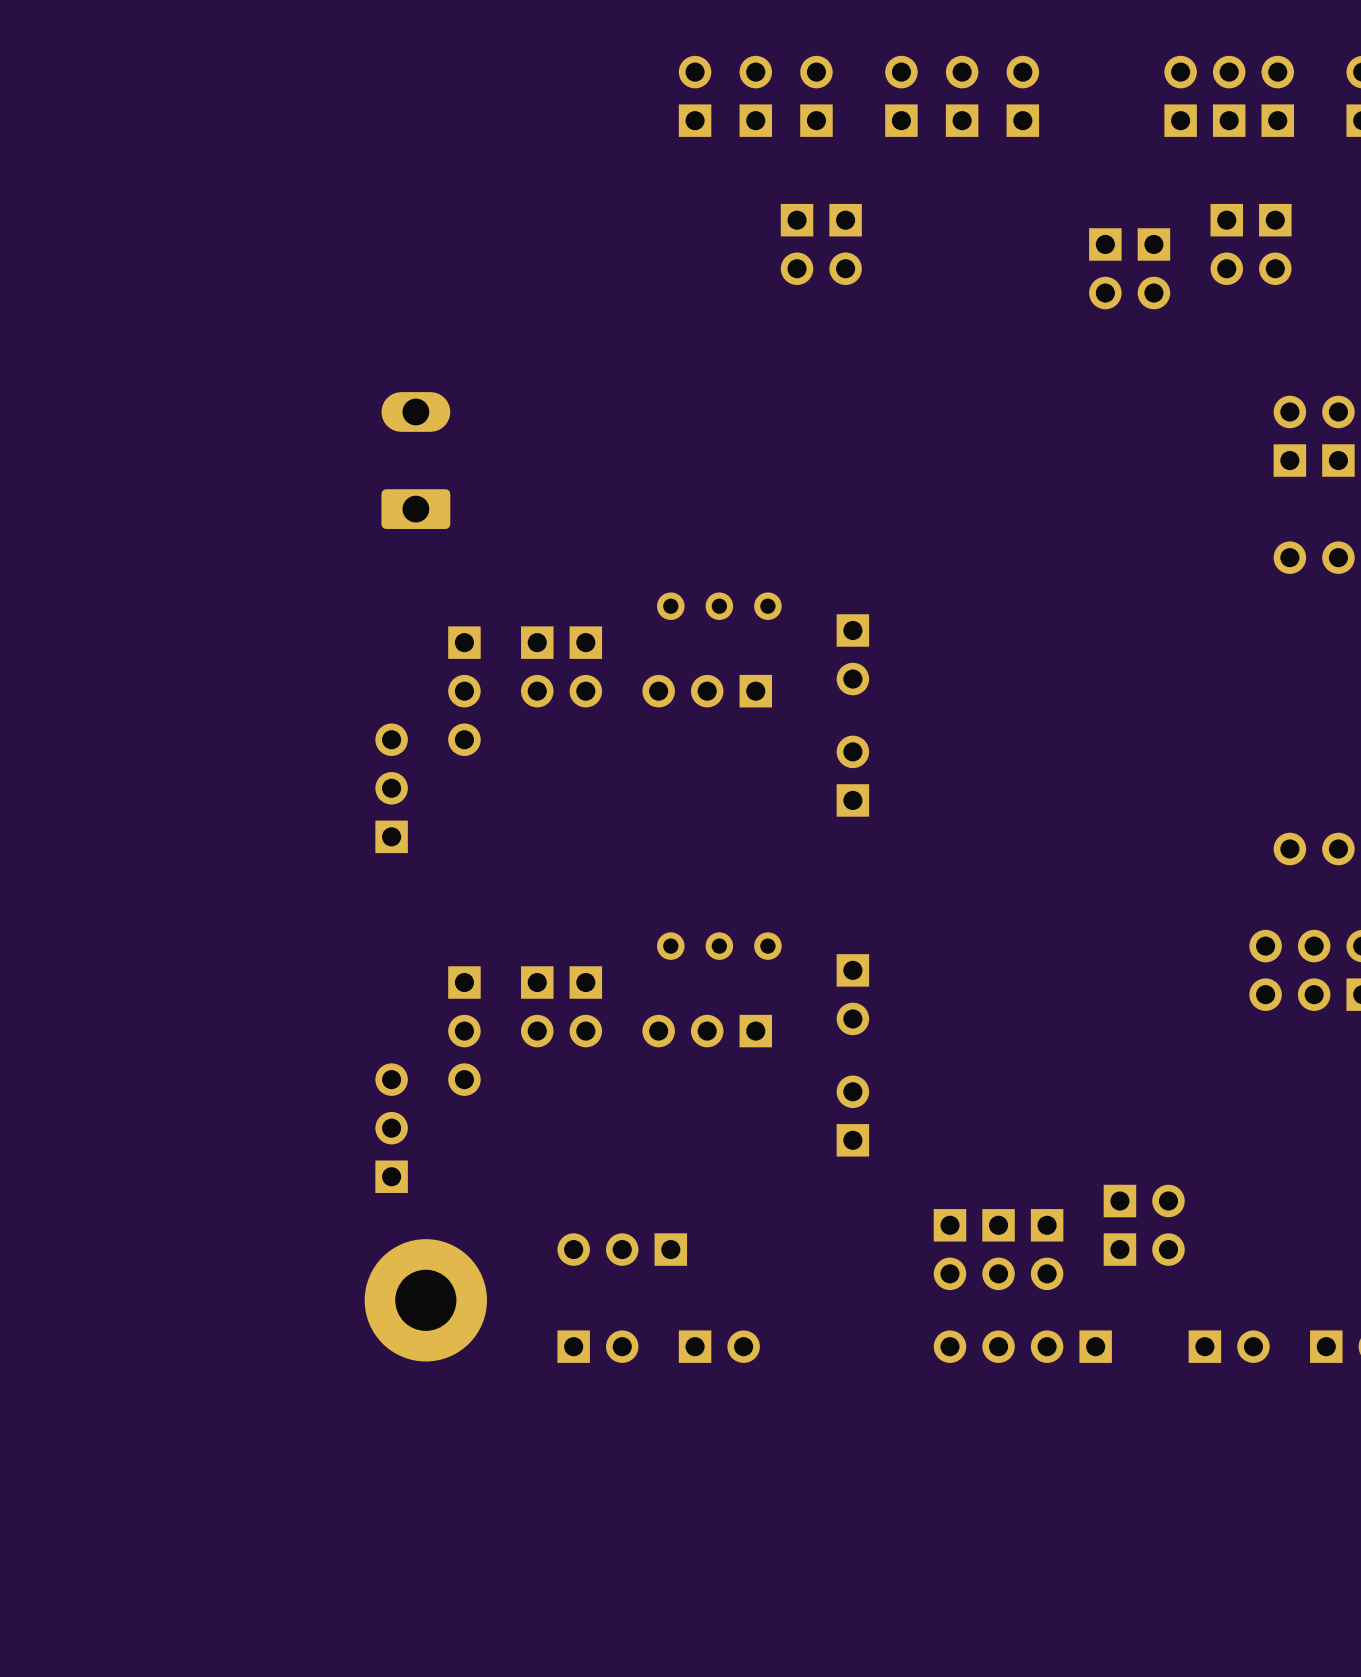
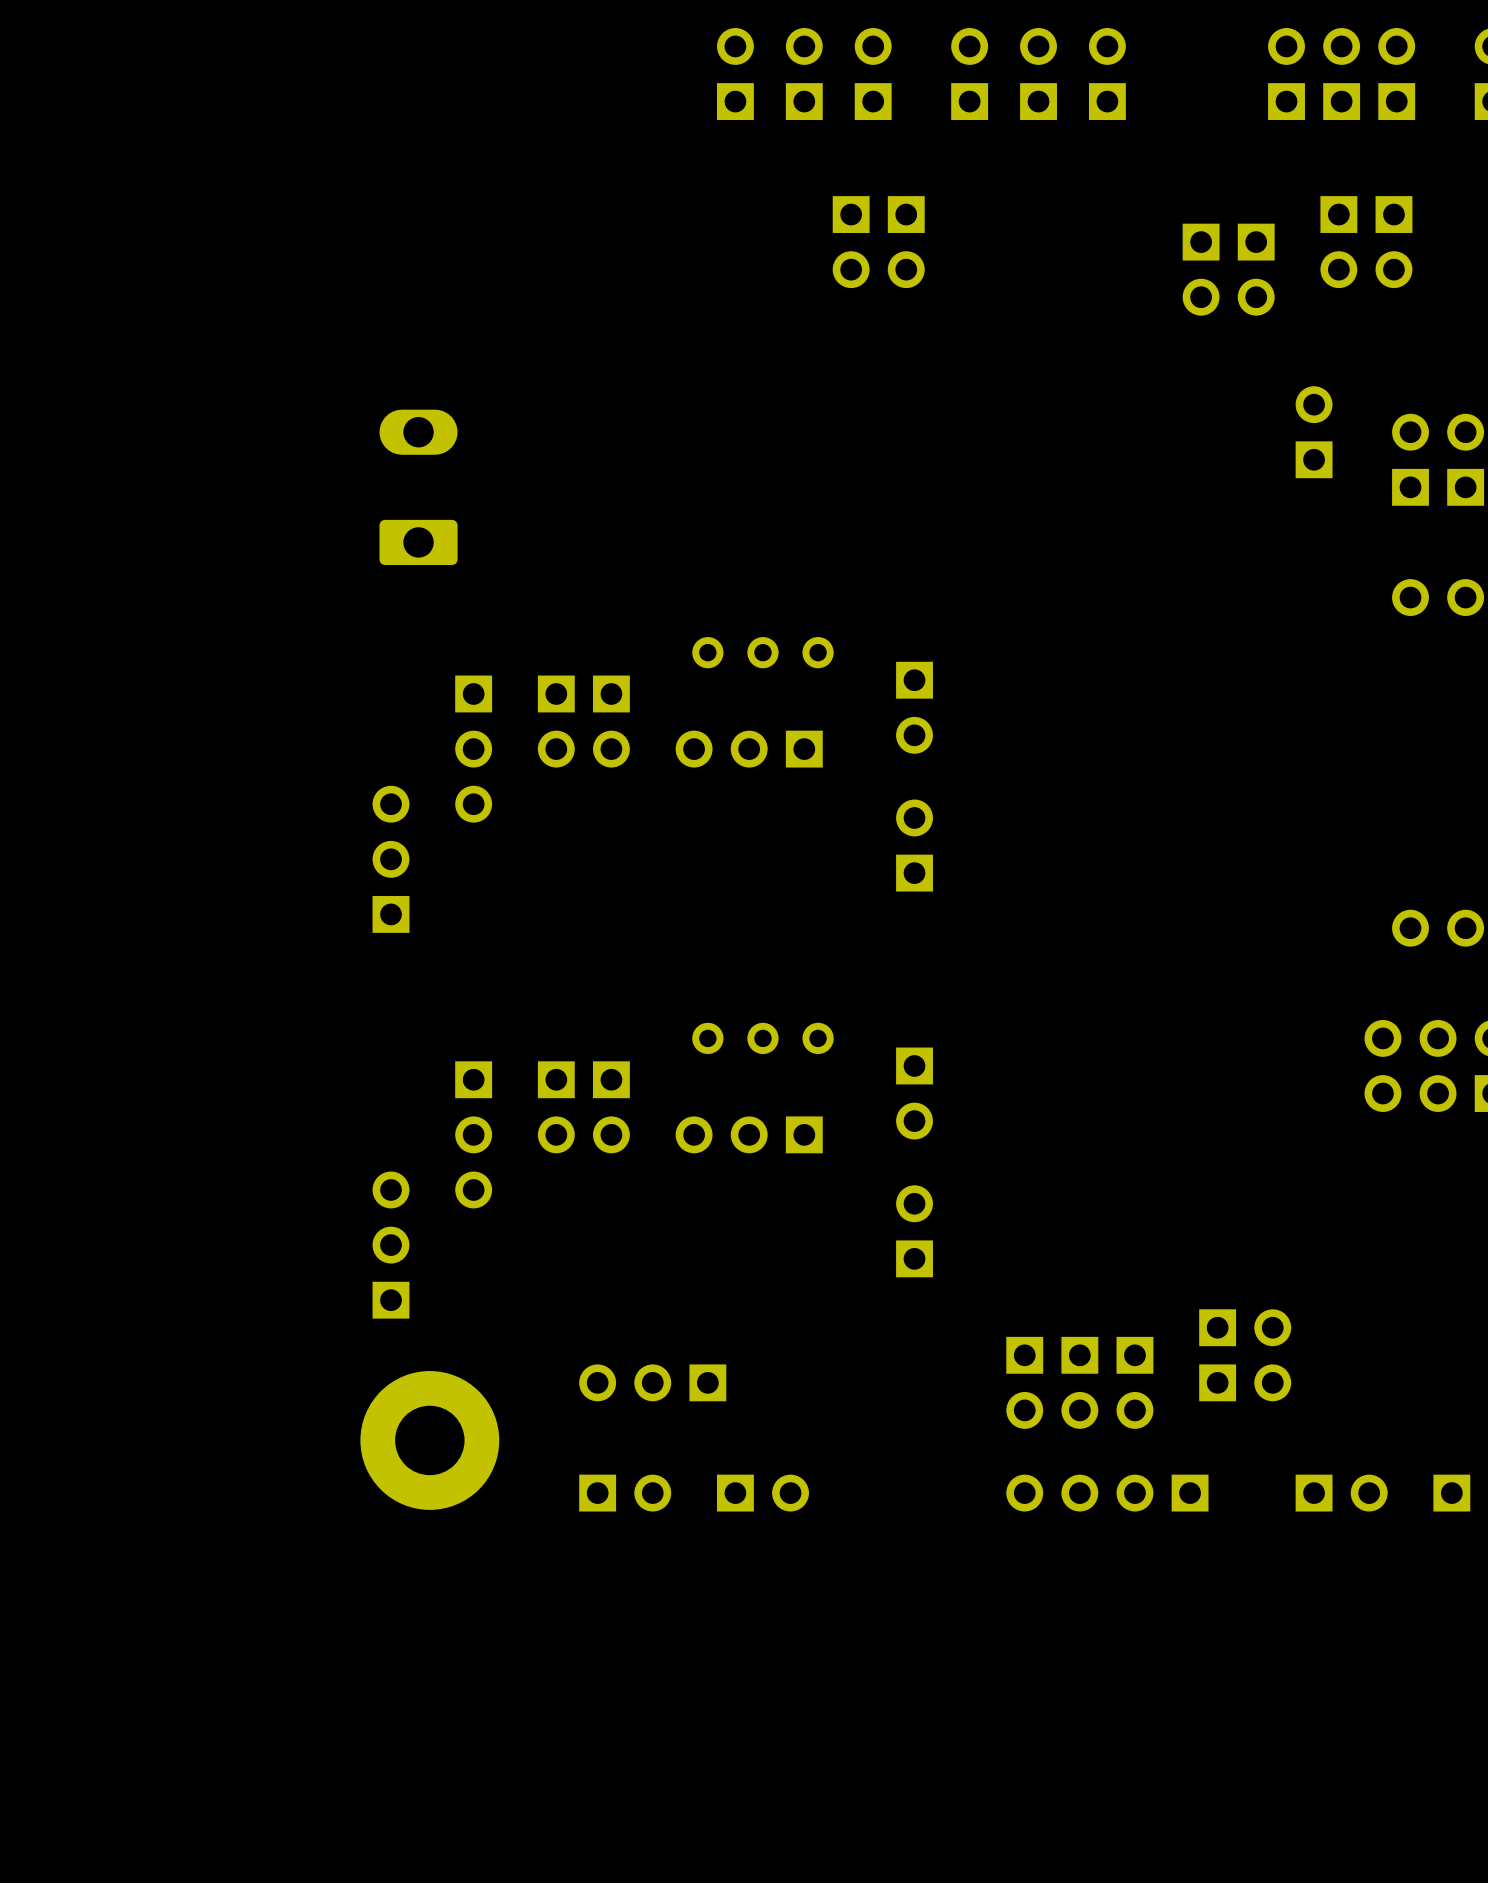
part: none -> (1314, 432)

